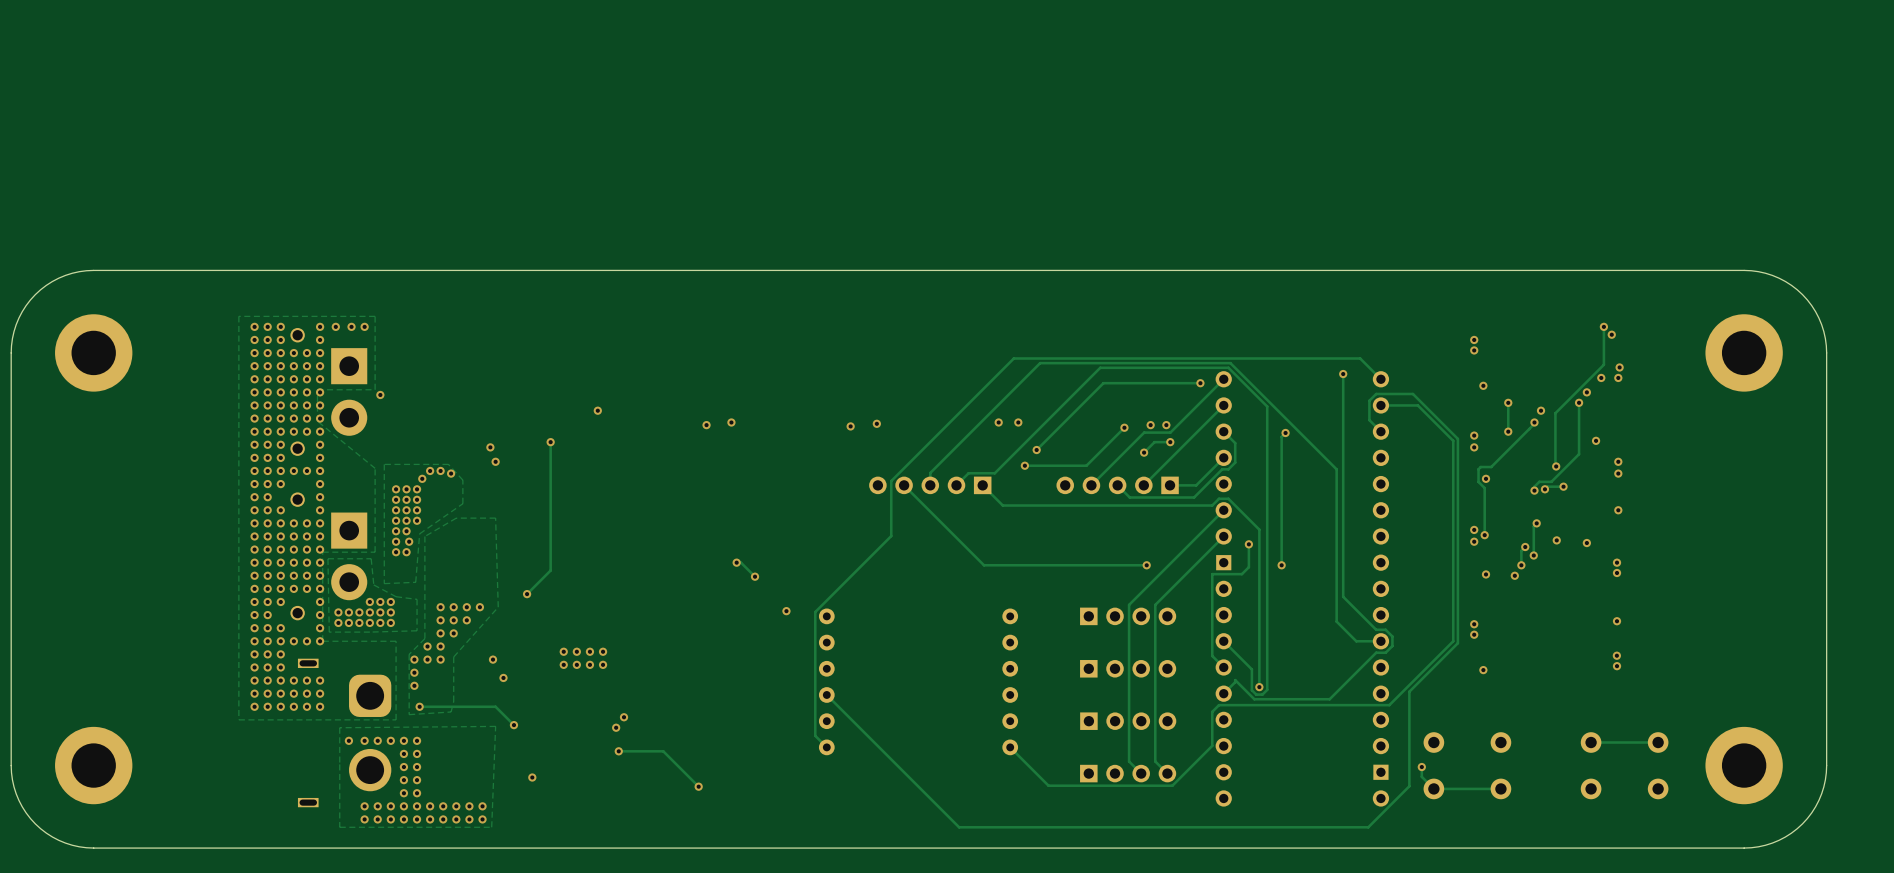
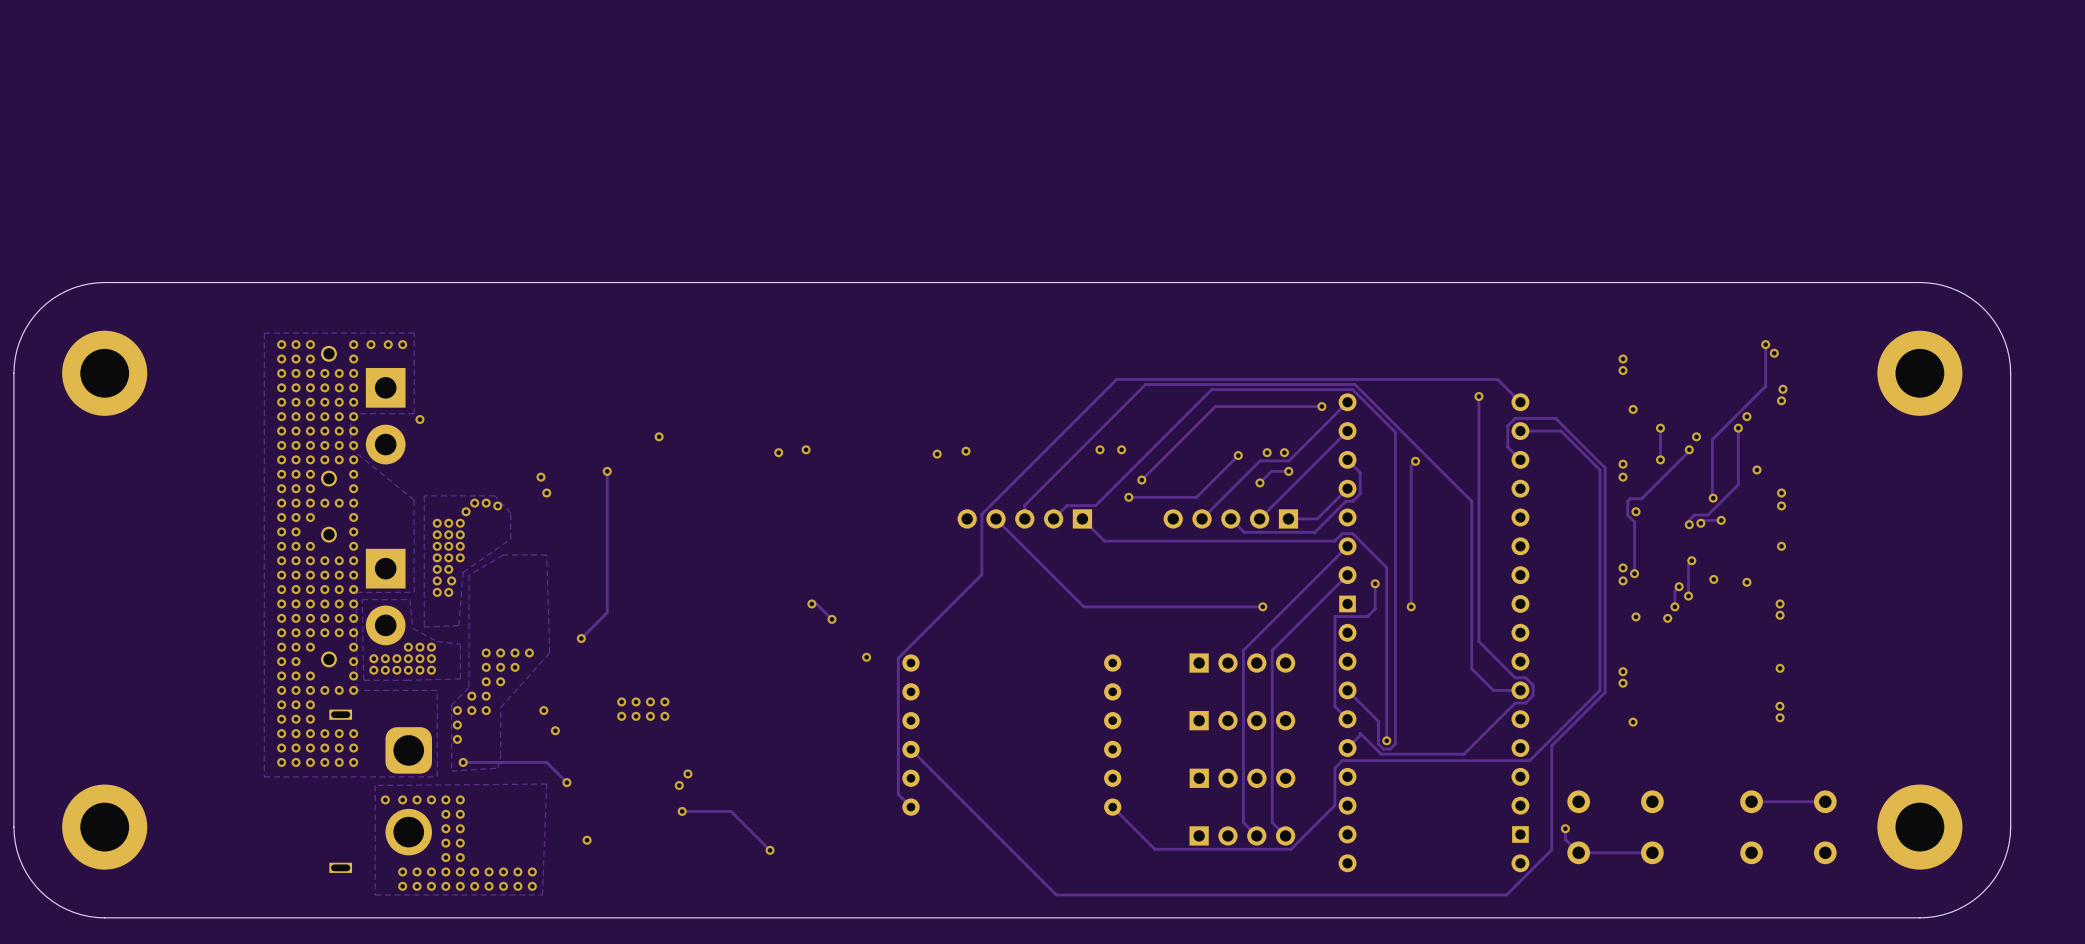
via: (1601, 377) -> none

